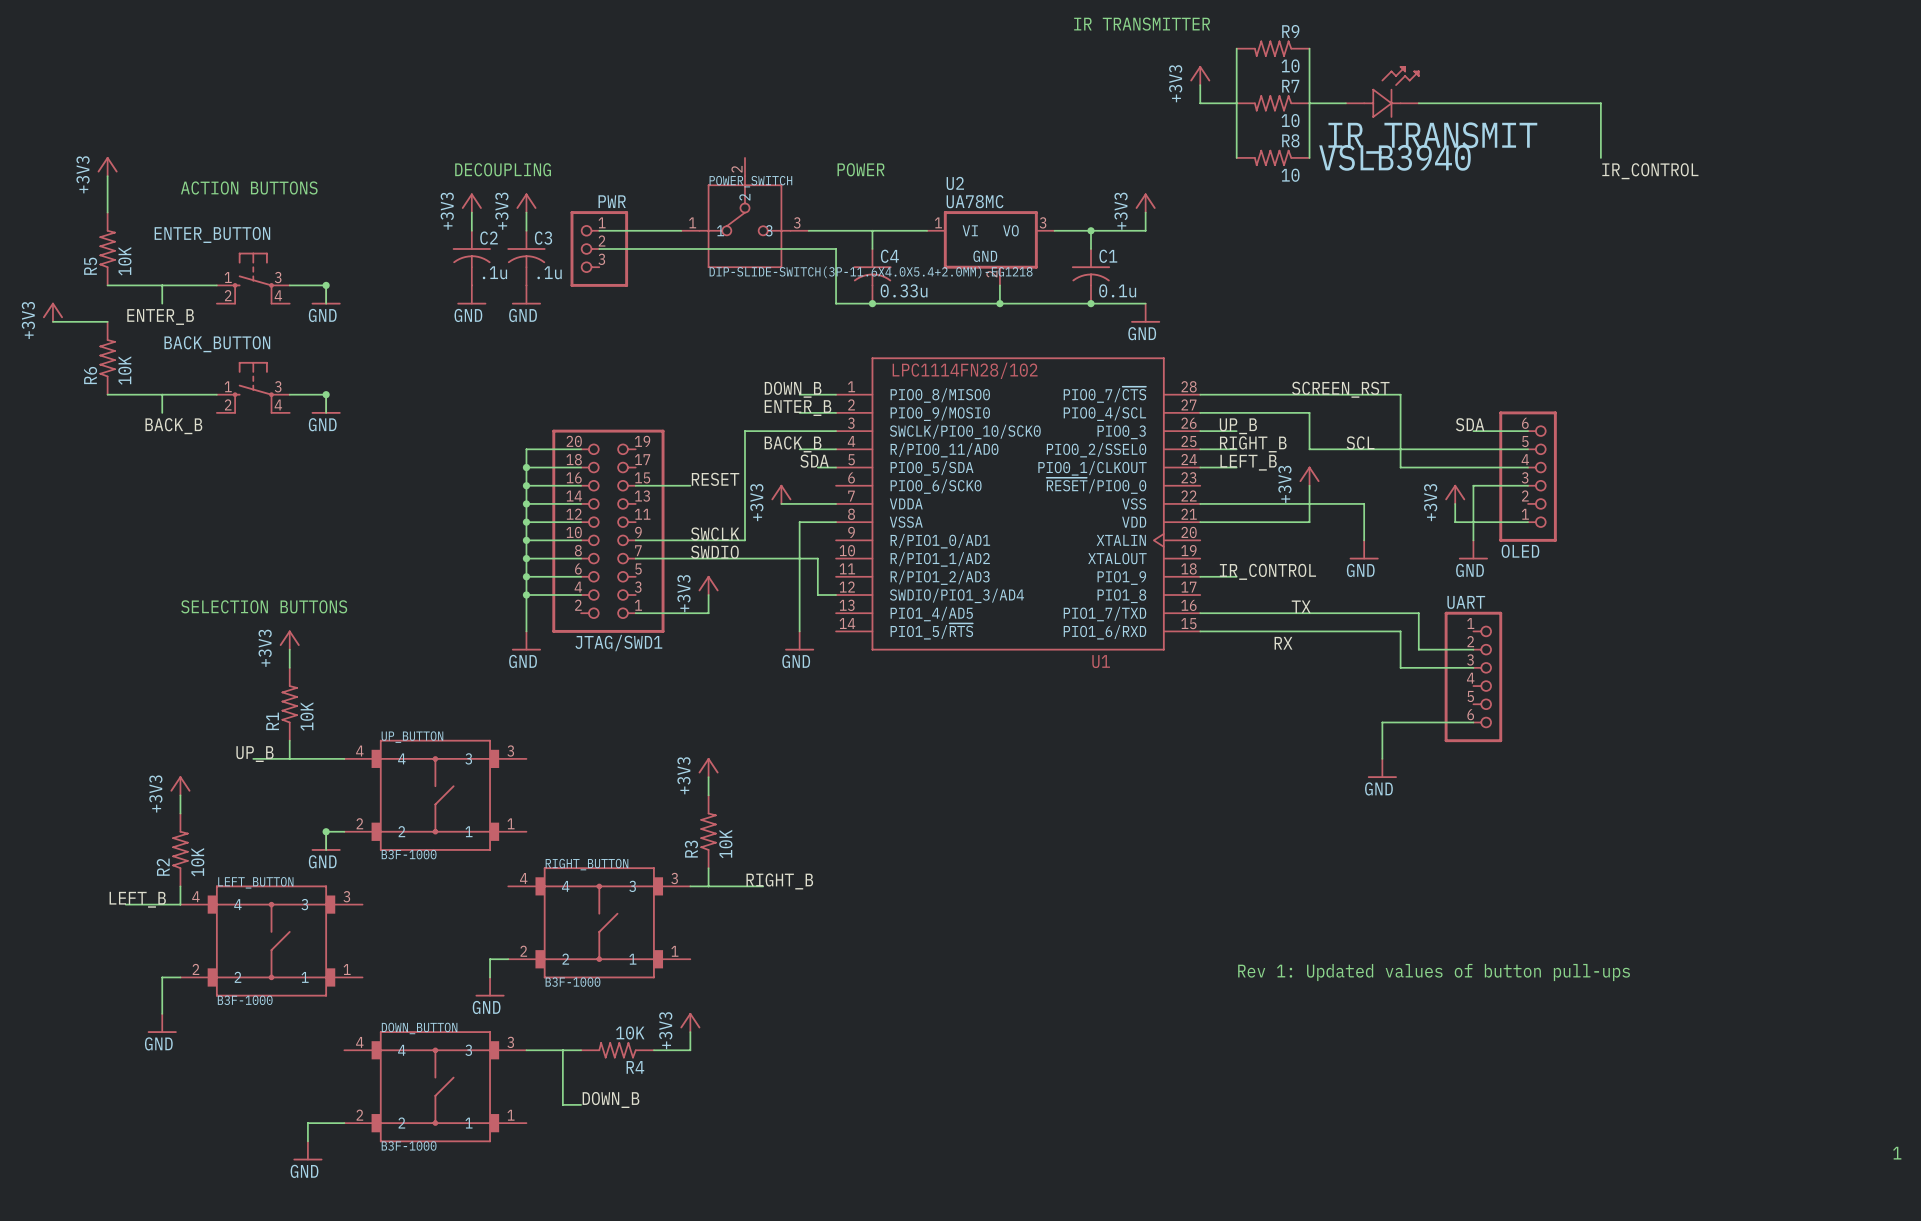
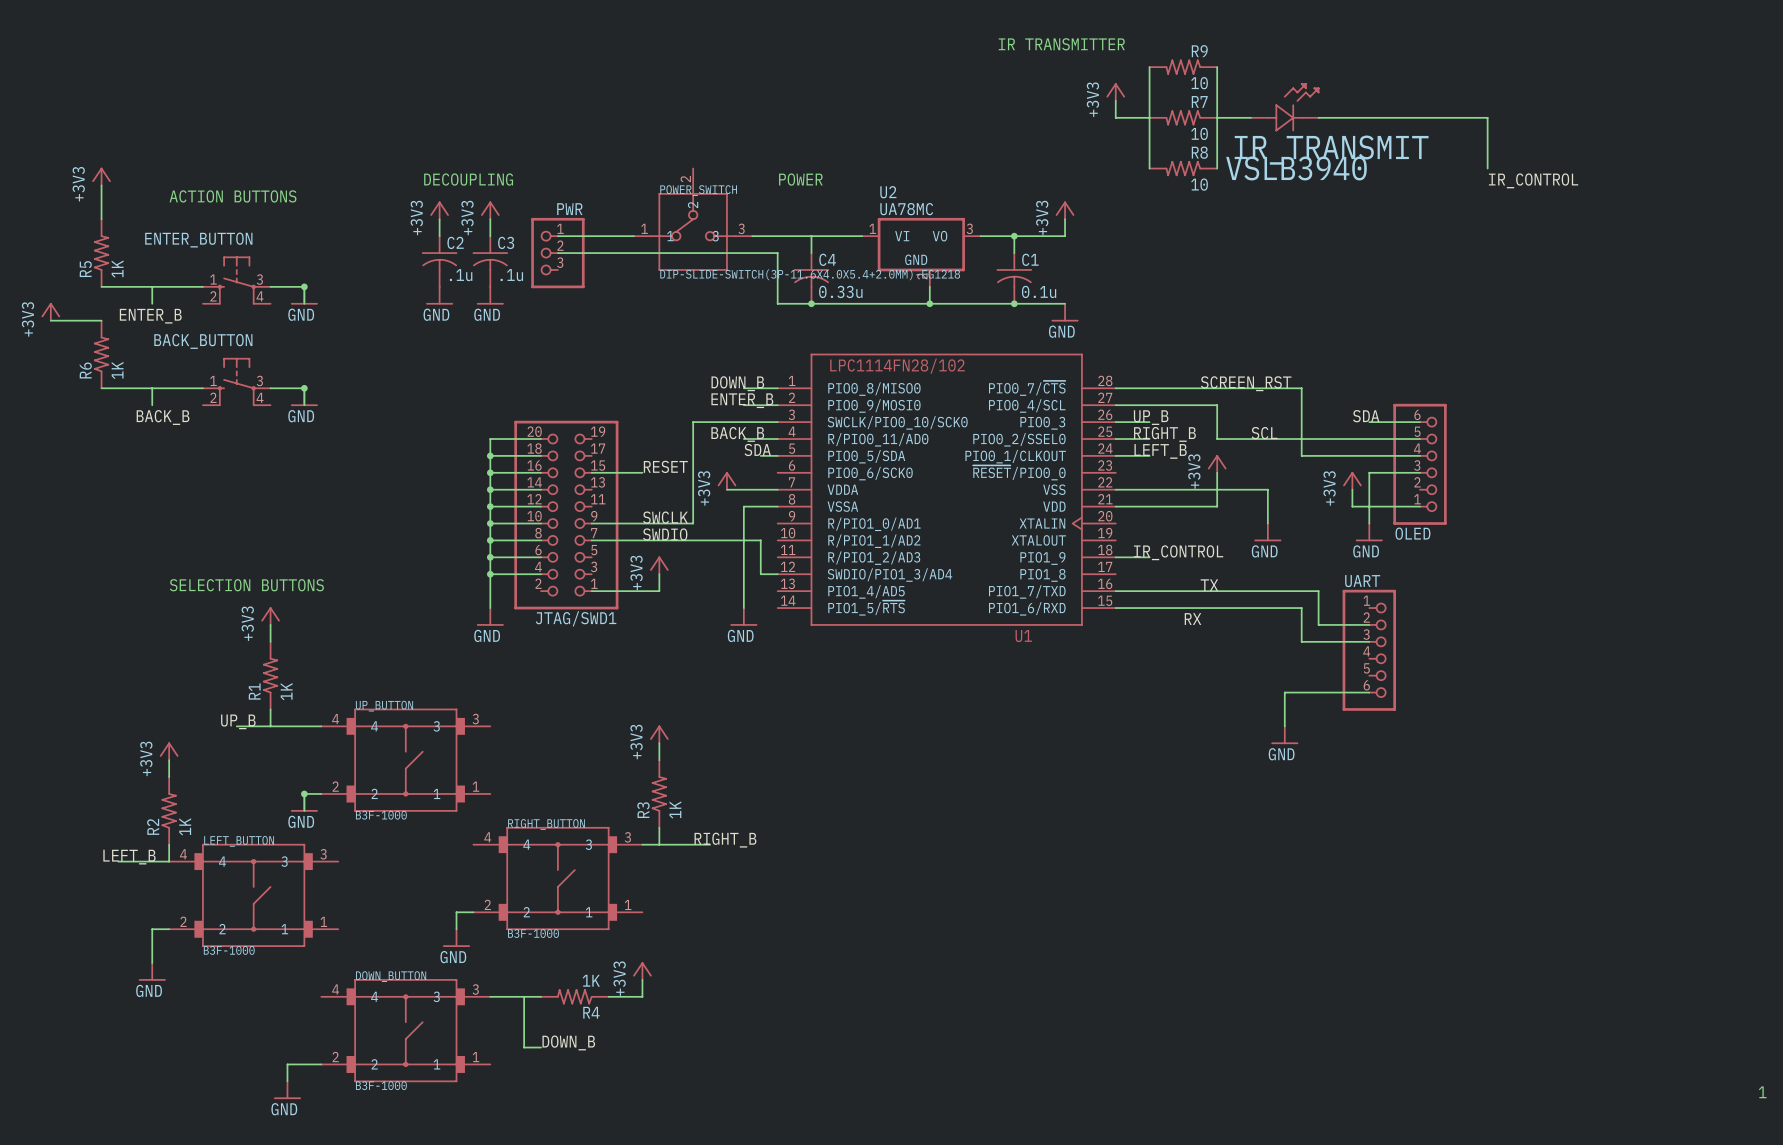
R5 value: 10K (124, 261) -> 1K (117, 269)
R6 value: 10K (124, 370) -> 1K (117, 370)
R1 value: 10K (307, 716) -> 1K (286, 691)
R3 value: 10K (725, 844) -> 1K (675, 809)
R2 value: 10K (197, 862) -> 1K (185, 826)
text: Rev 1: Updated values of button pull-ups (1434, 972) -> none
R4 value: 10K (630, 1032) -> 1K (591, 980)

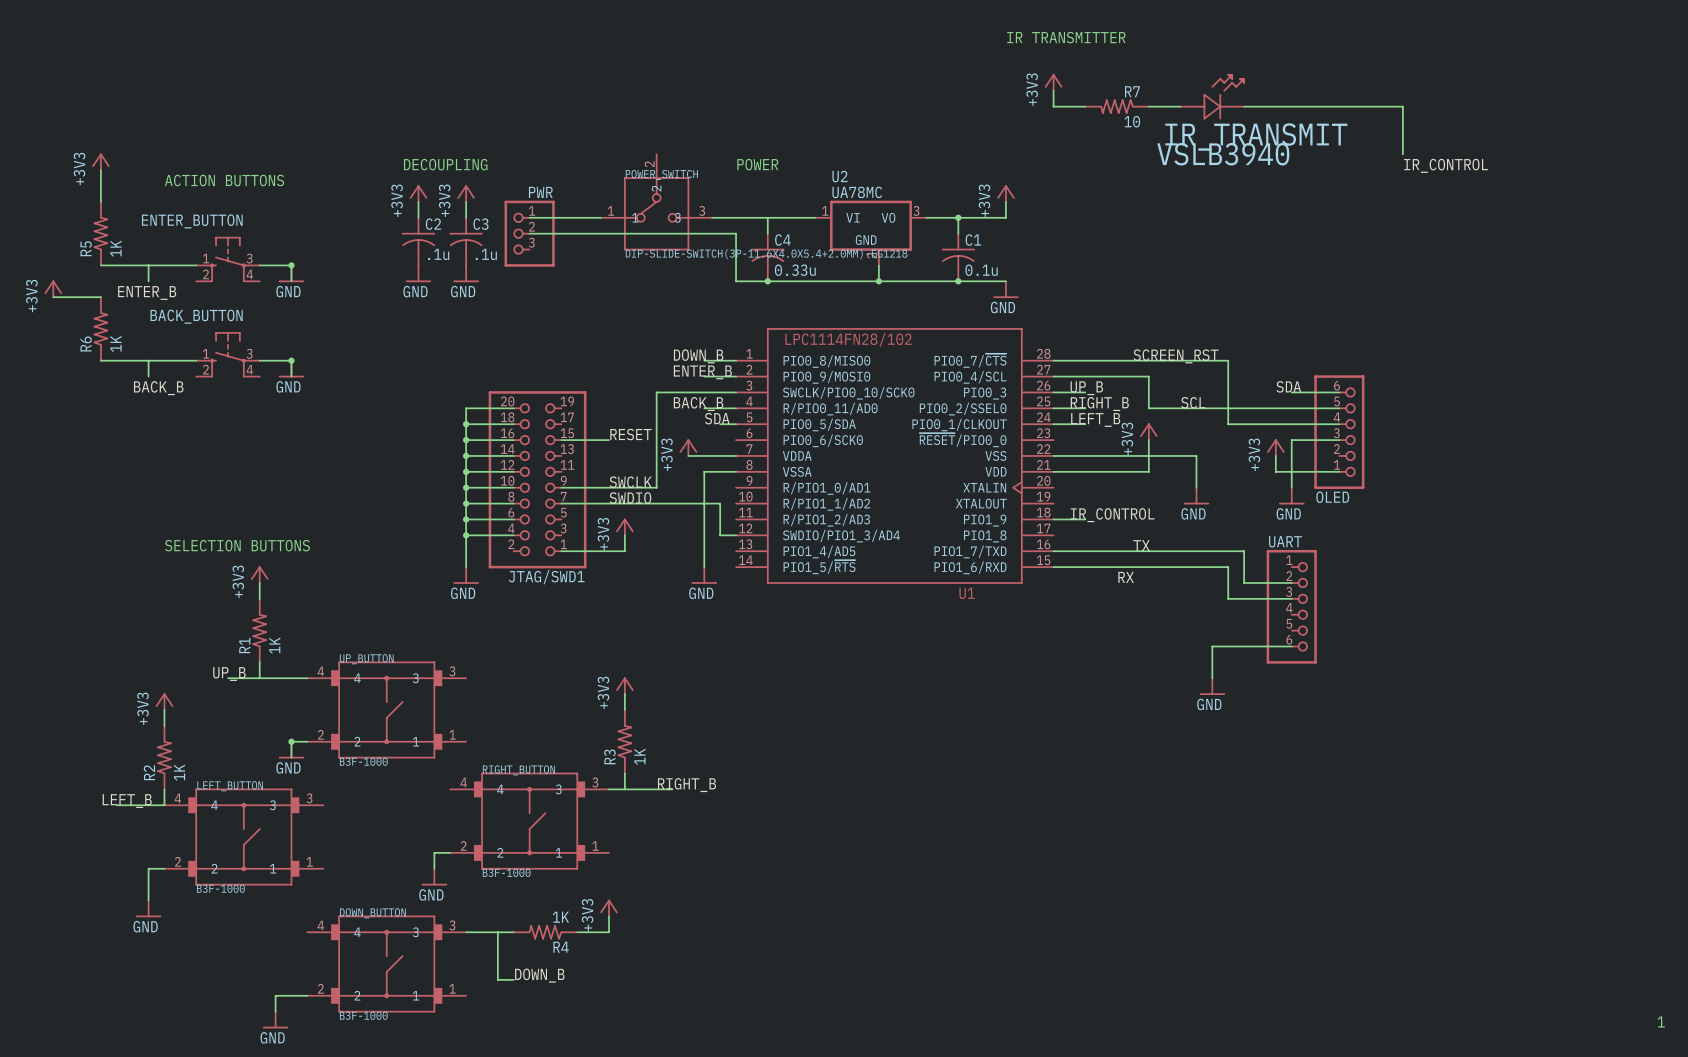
text position: IR TRANSMITTER (1061, 44) -> IR TRANSMITTER (1066, 37)
wire: (1149, 67) (1149, 168) -> none
R9: 10 (1183, 67) -> none
wire: (1217, 67) (1217, 168) -> none
R8: 10 (1183, 168) -> none

